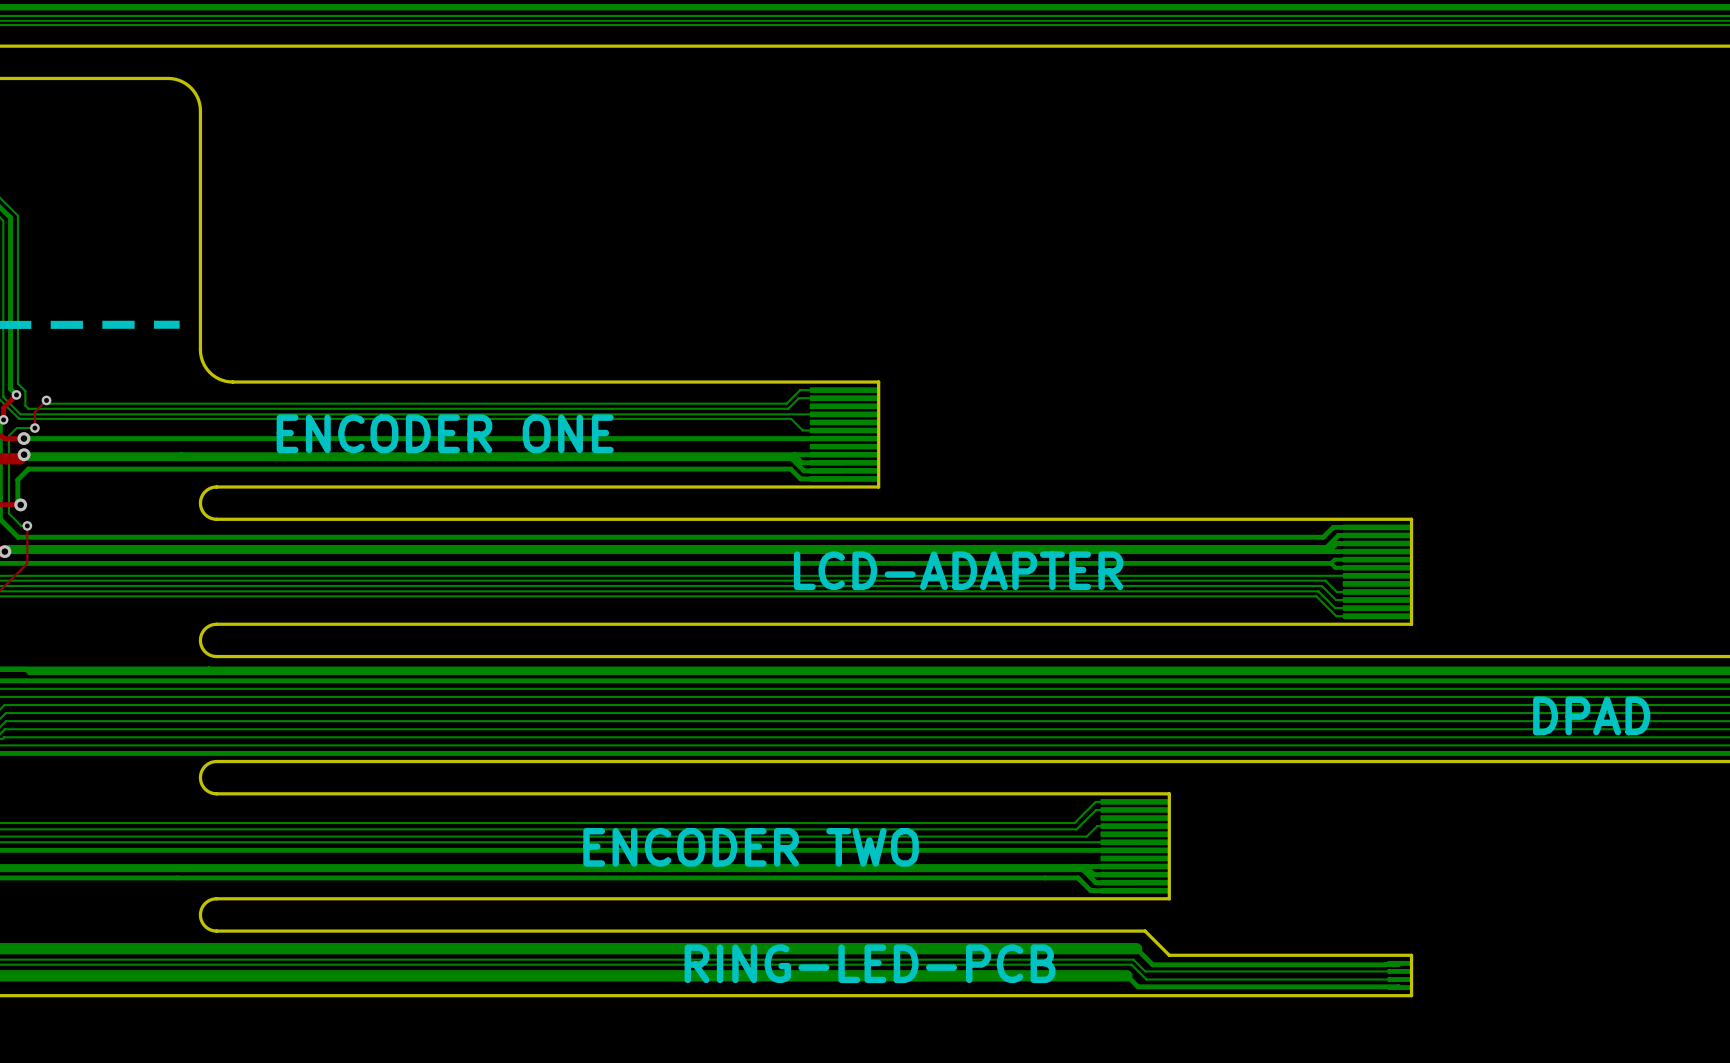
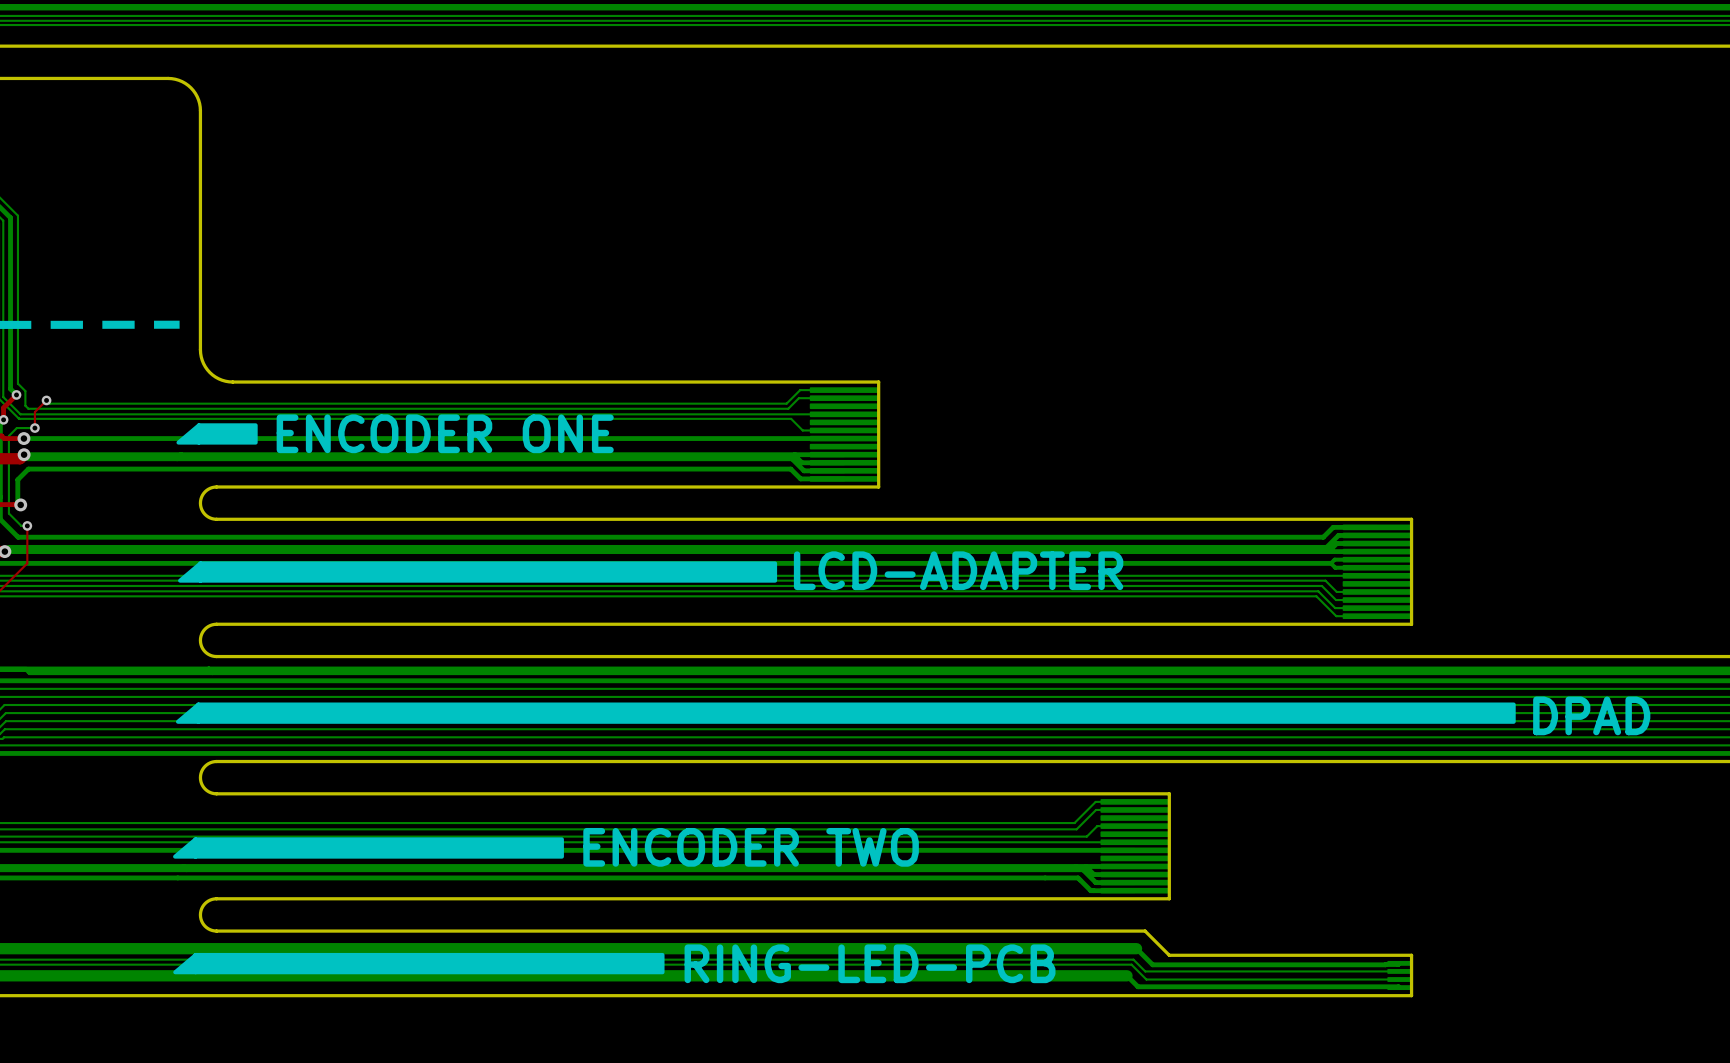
drawing: none -> [176, 423, 258, 445]
drawing: none -> [178, 561, 778, 583]
drawing: none -> [175, 702, 1516, 724]
drawing: none -> [173, 837, 564, 859]
drawing: none -> [173, 952, 665, 975]

